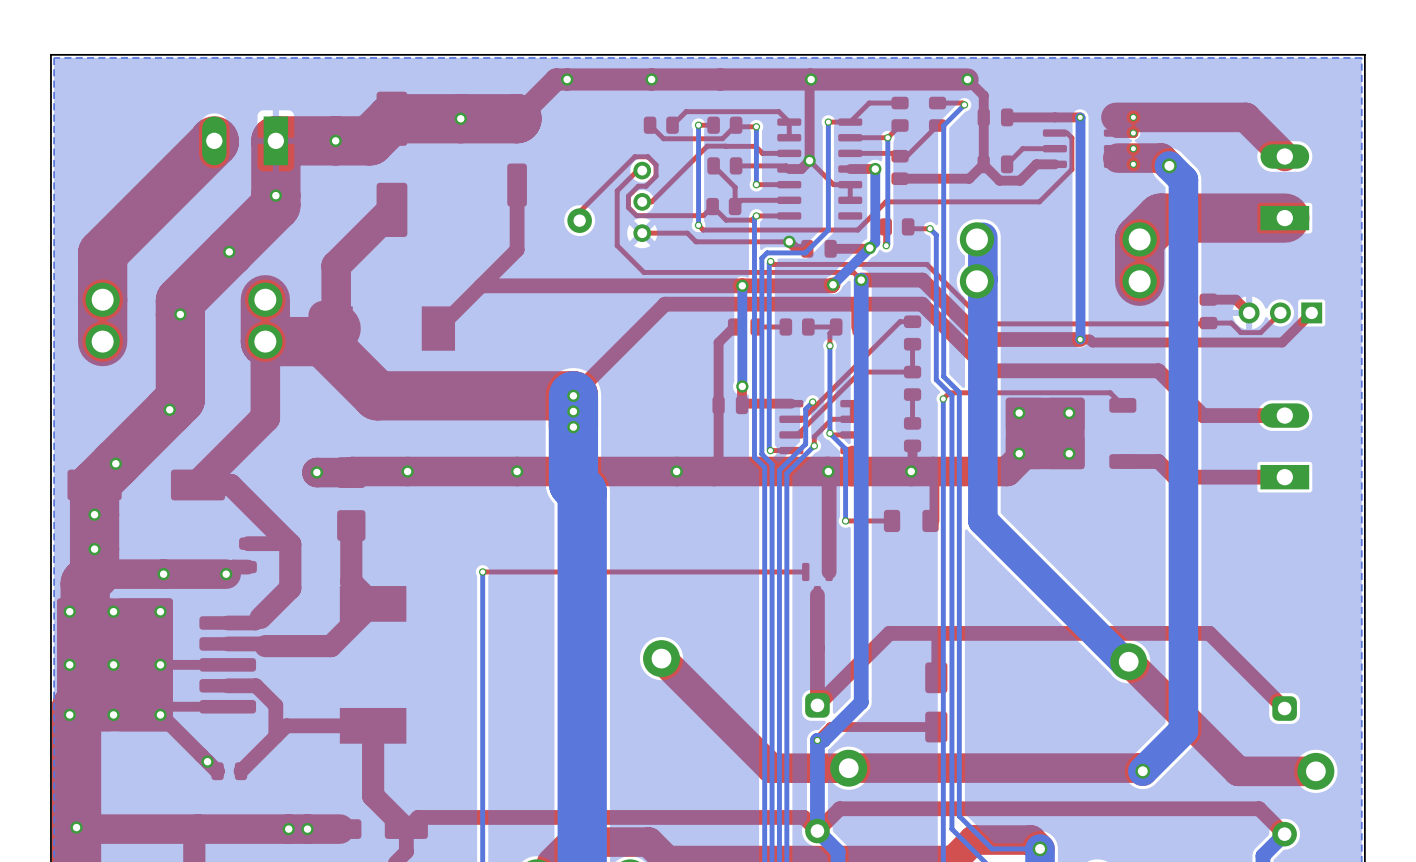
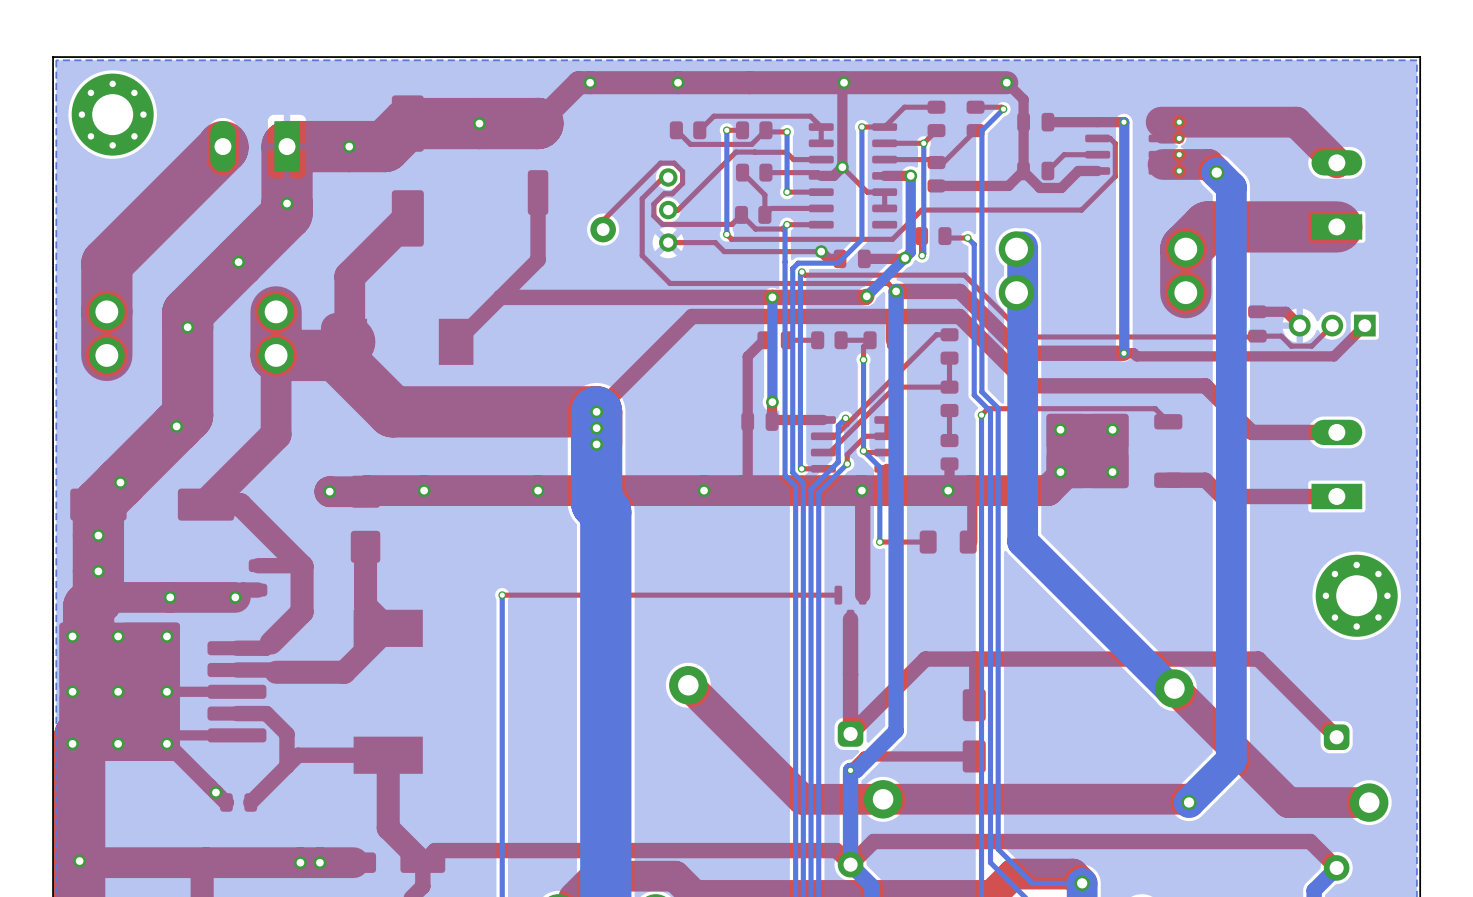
part: none -> (112, 114)
part: none -> (1356, 595)

